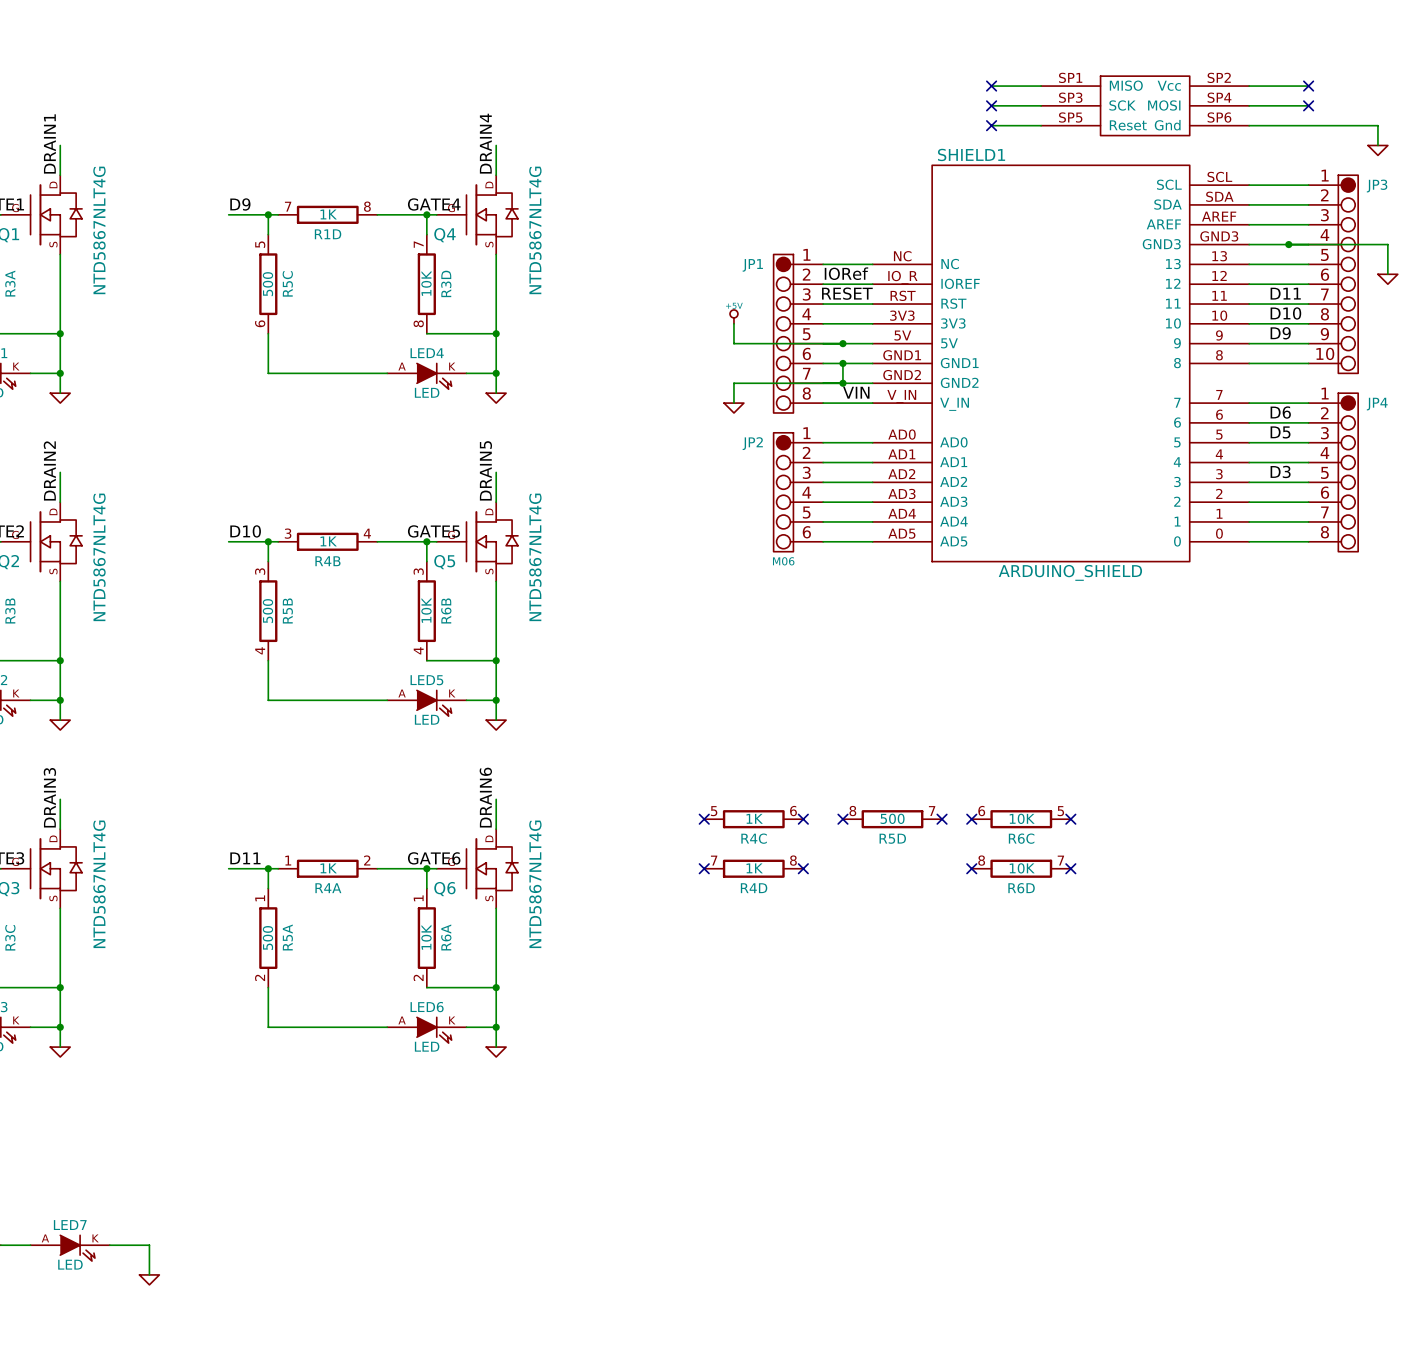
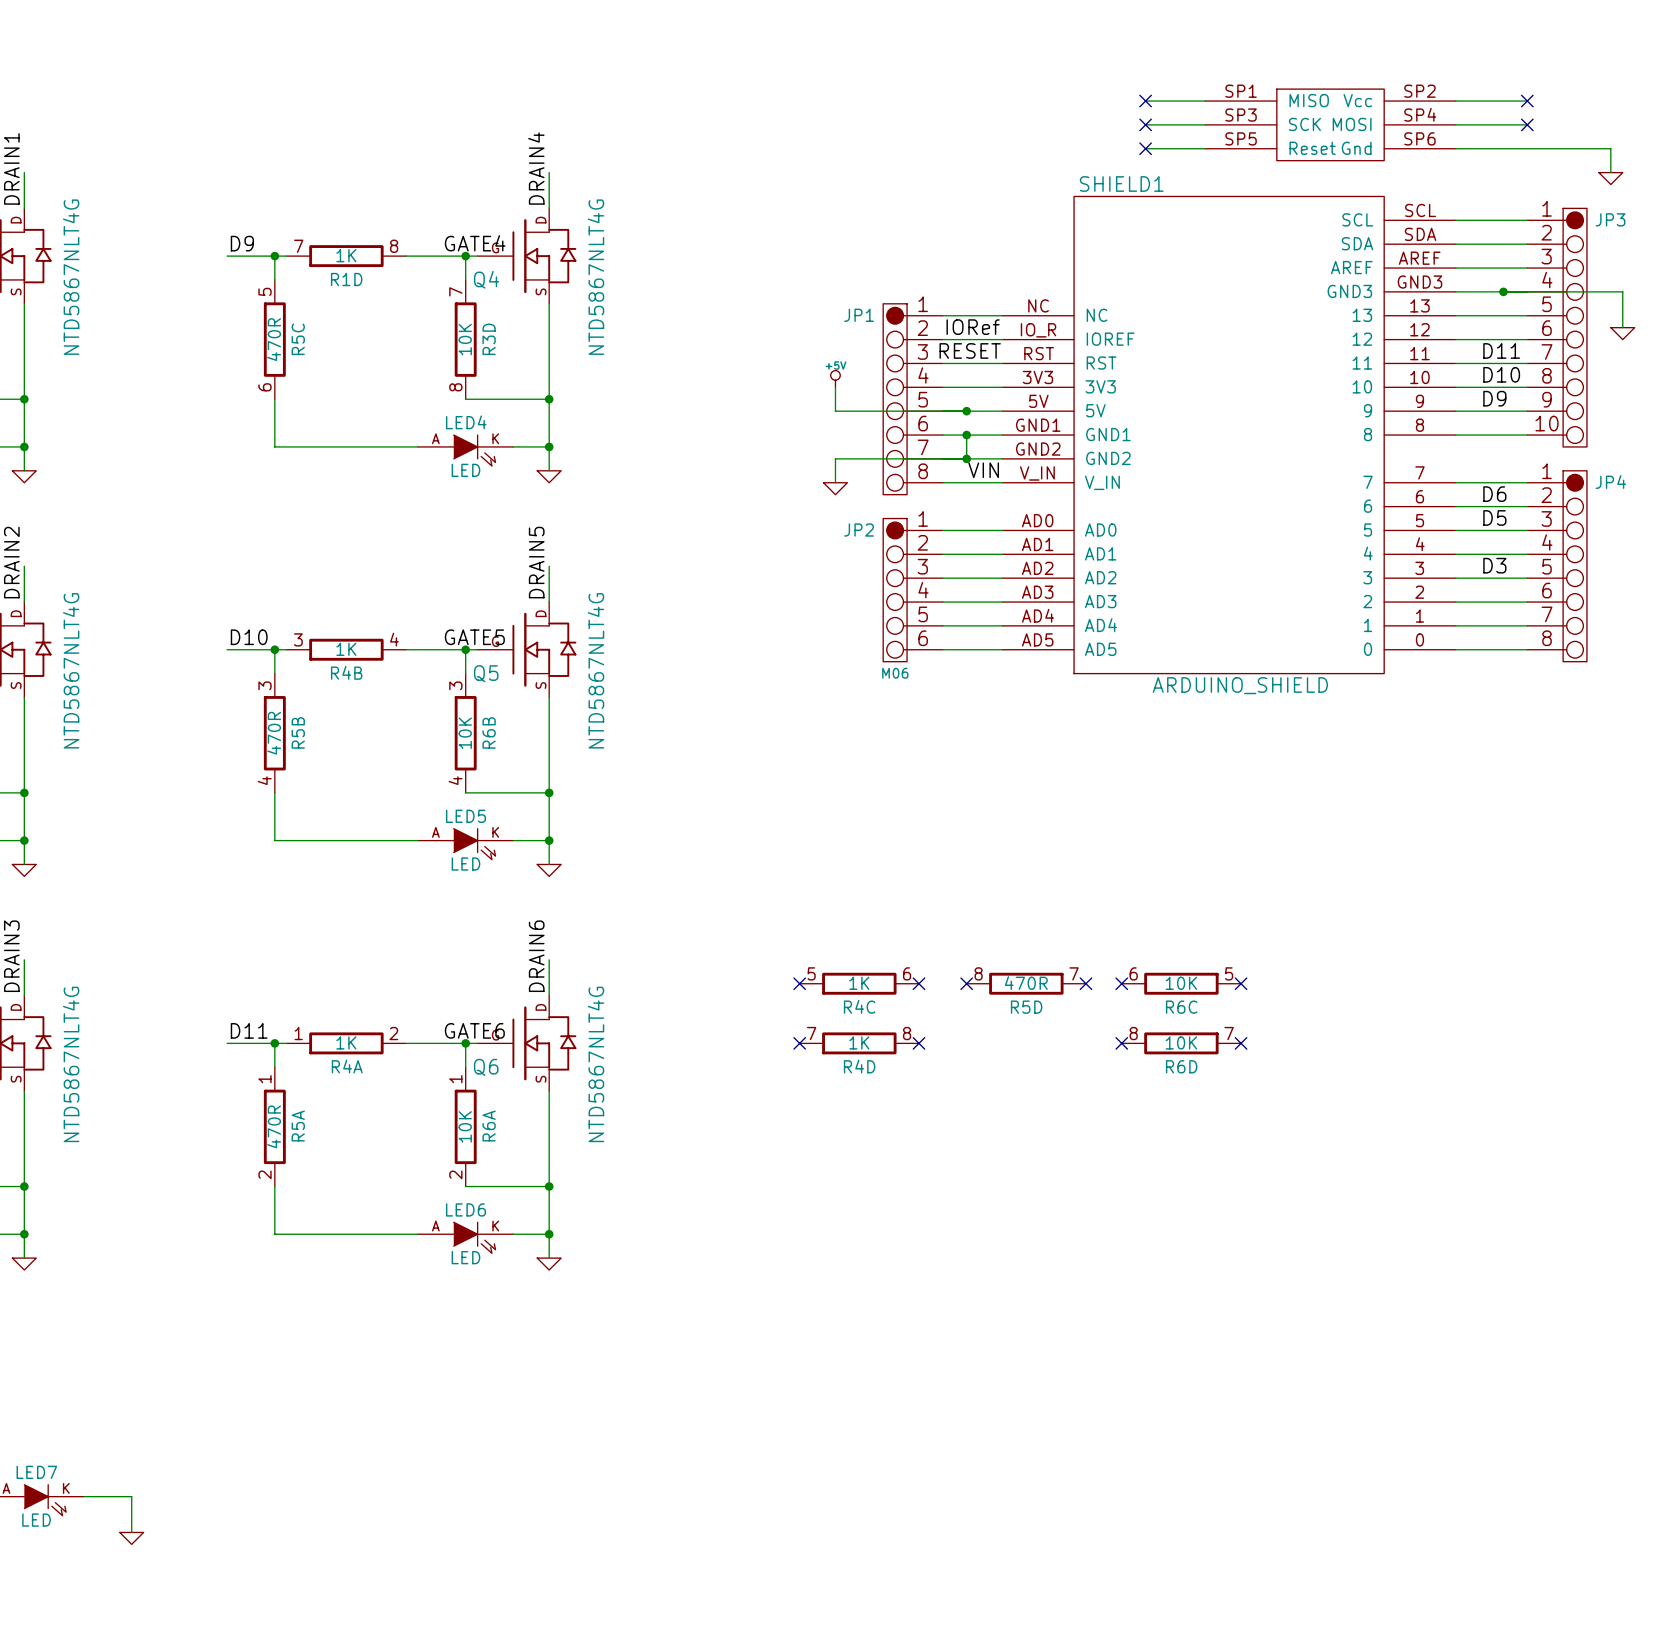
R5C value: 500 (267, 284) -> 470R (274, 339)
R5B value: 500 (267, 611) -> 470R (274, 733)
R5D value: 500 (892, 818) -> 470R (1026, 983)
R5A value: 500 (267, 938) -> 470R (274, 1126)

